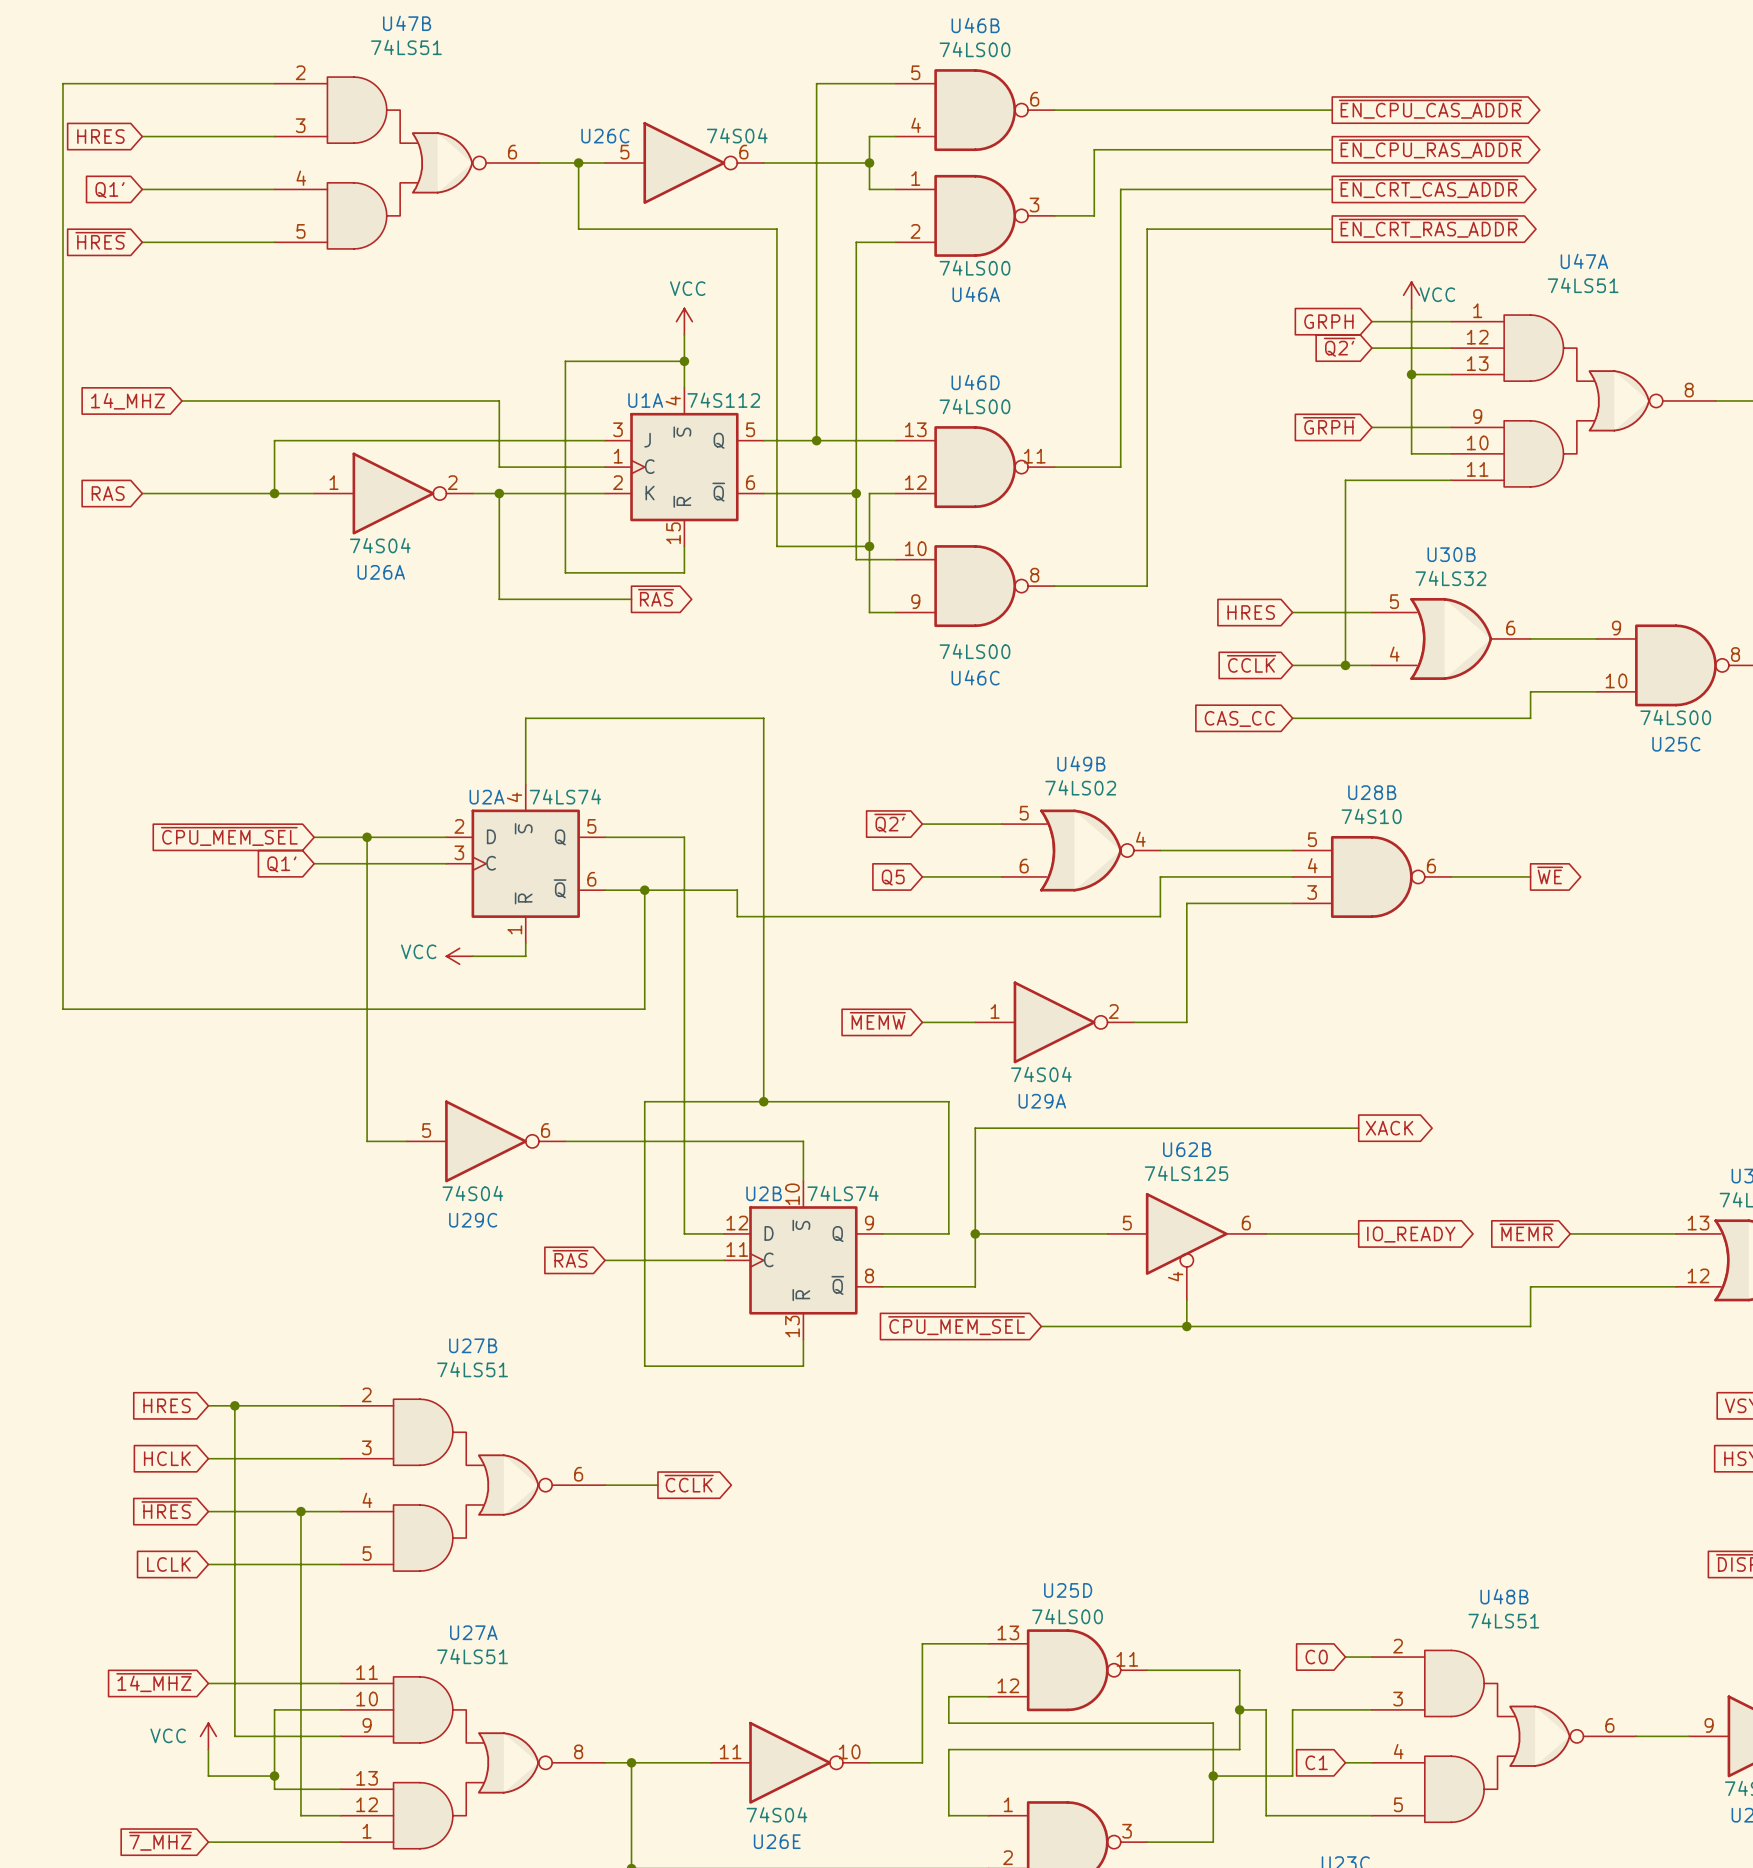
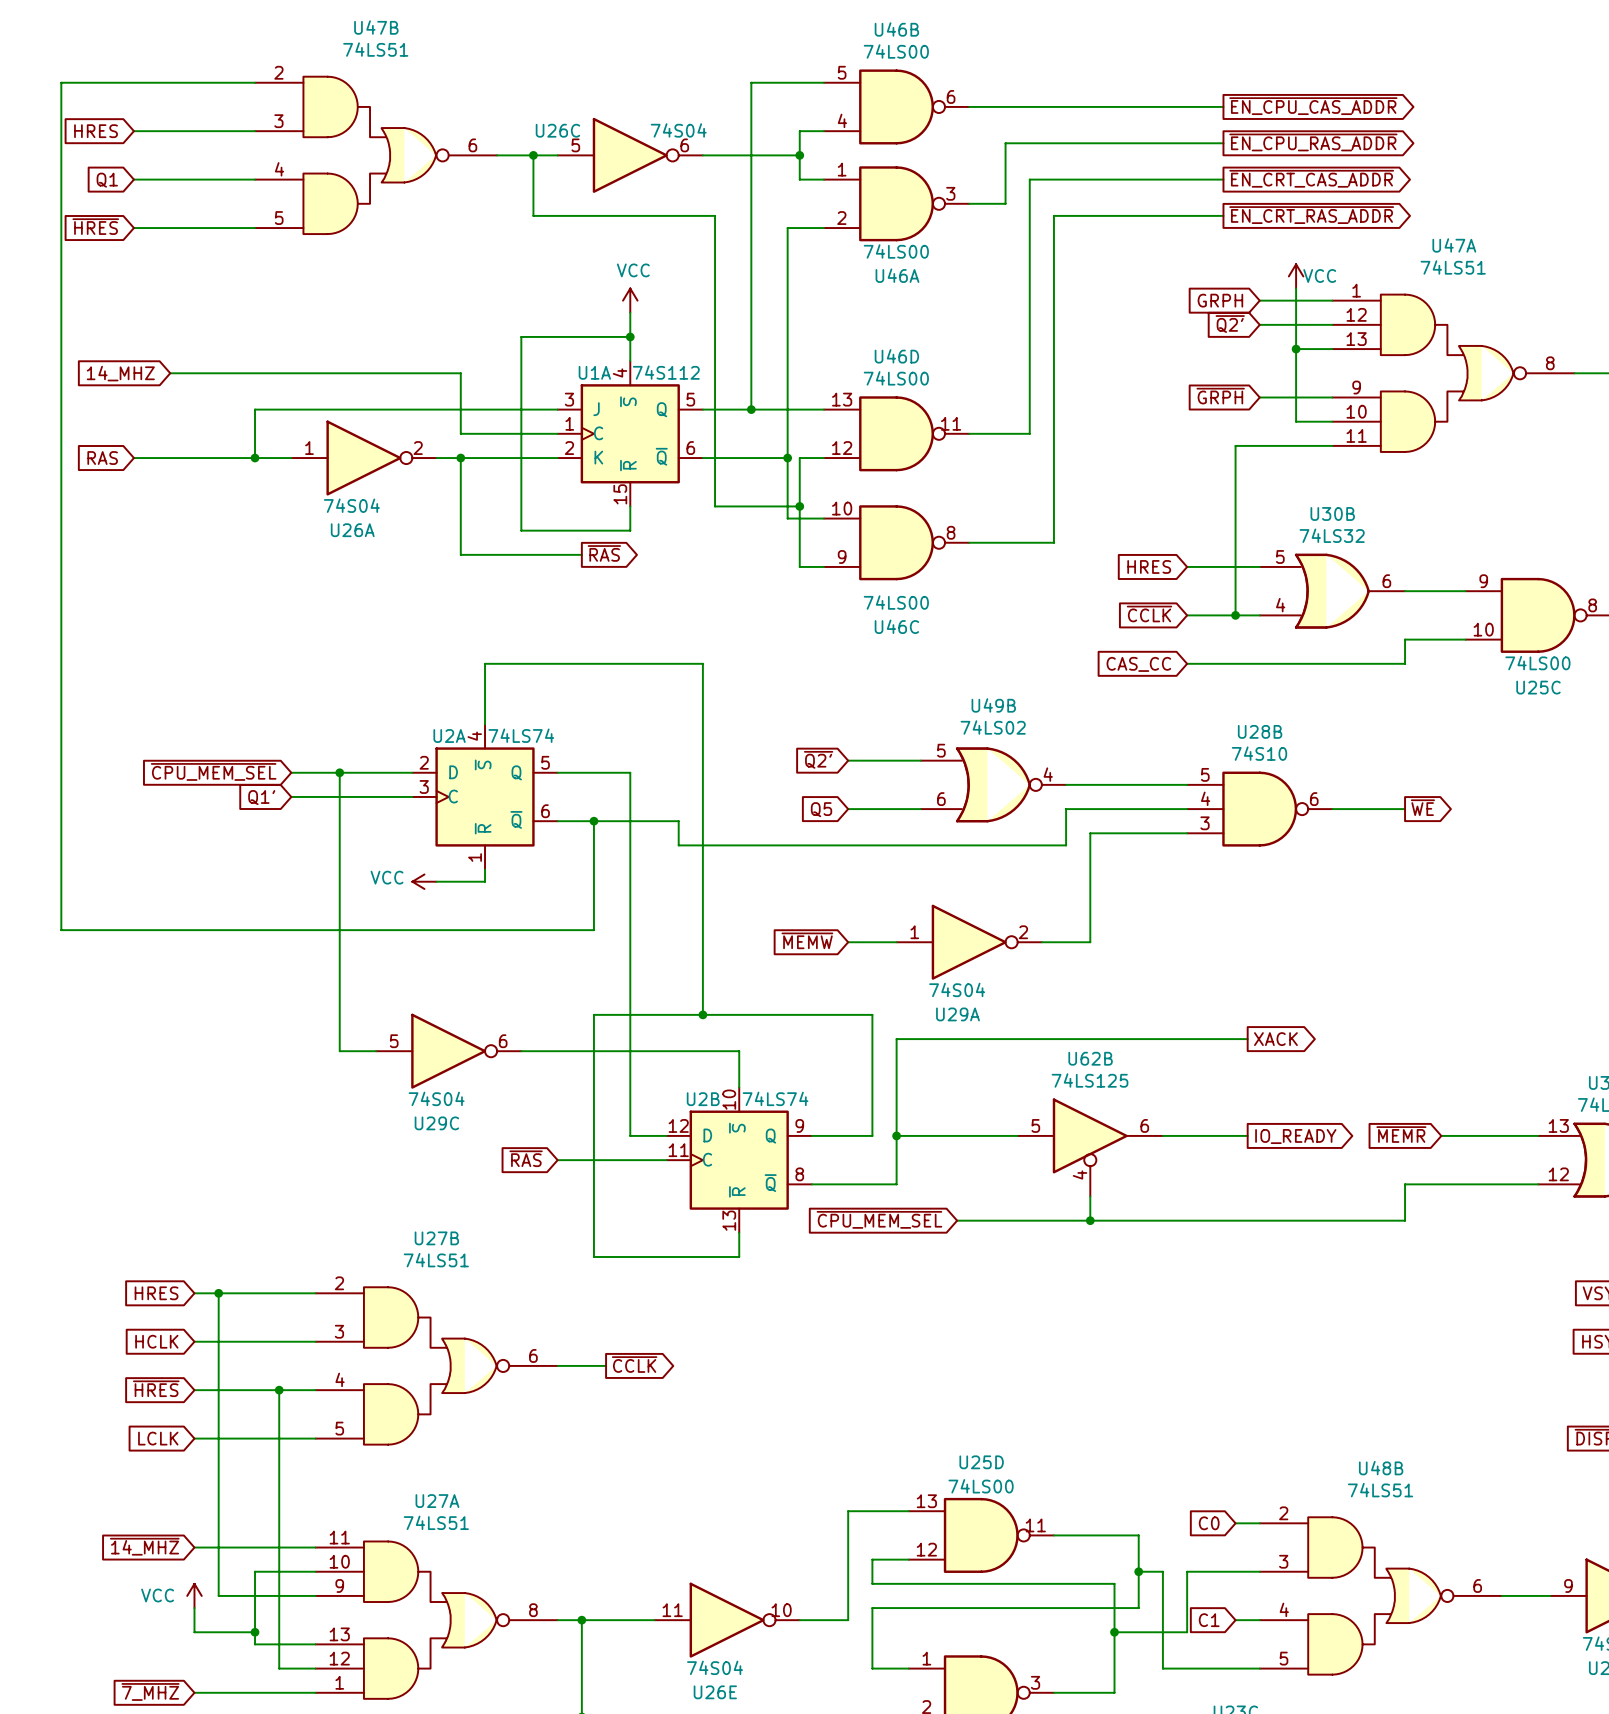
global label: Q1' (110, 190) -> Q1 (107, 180)

